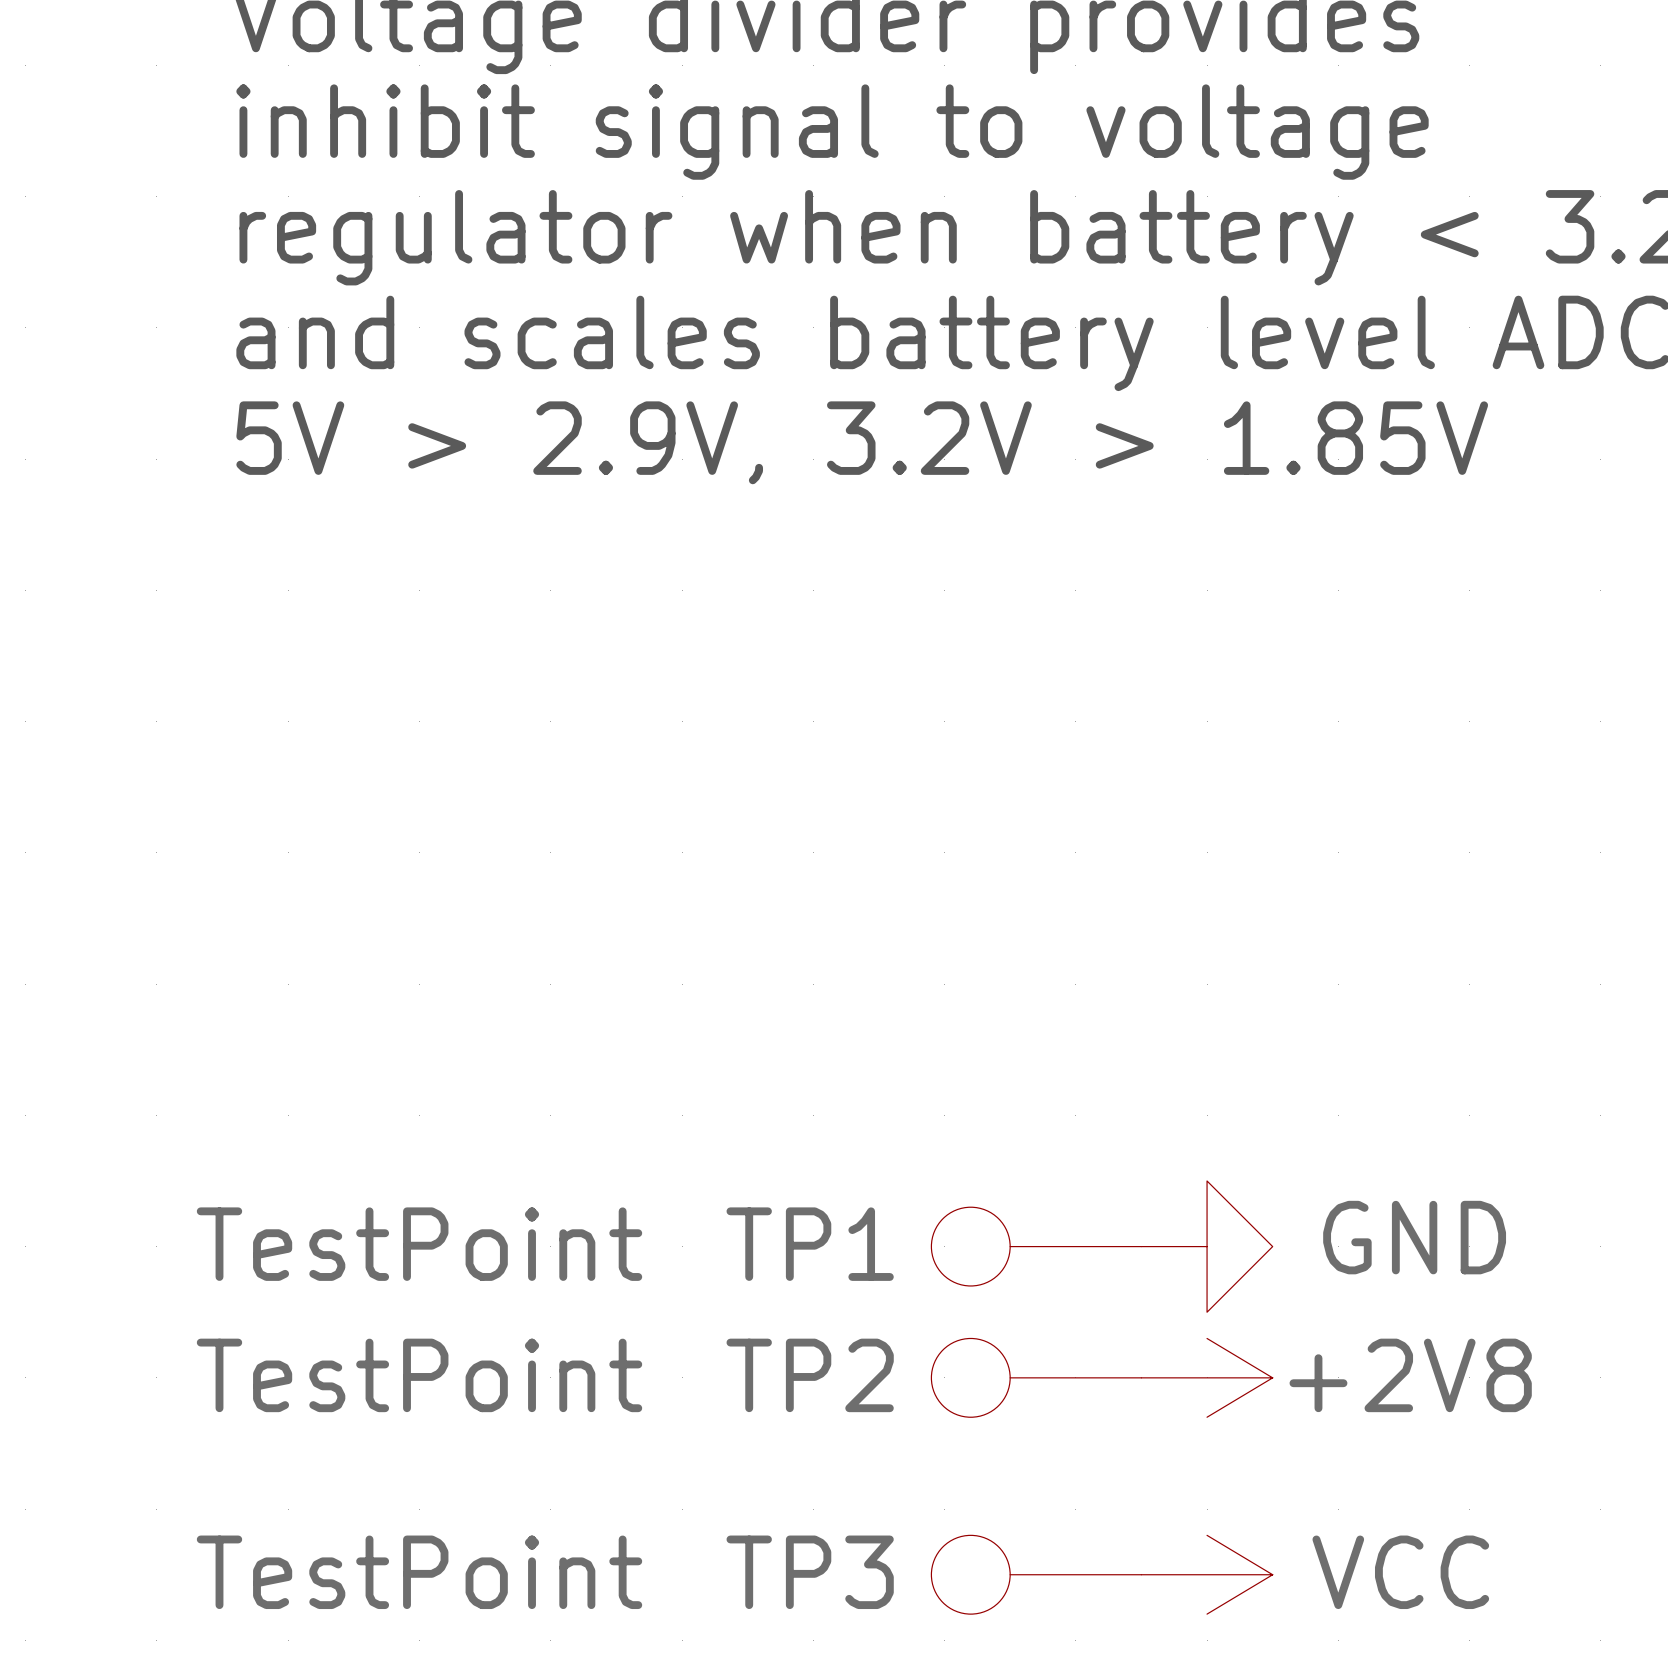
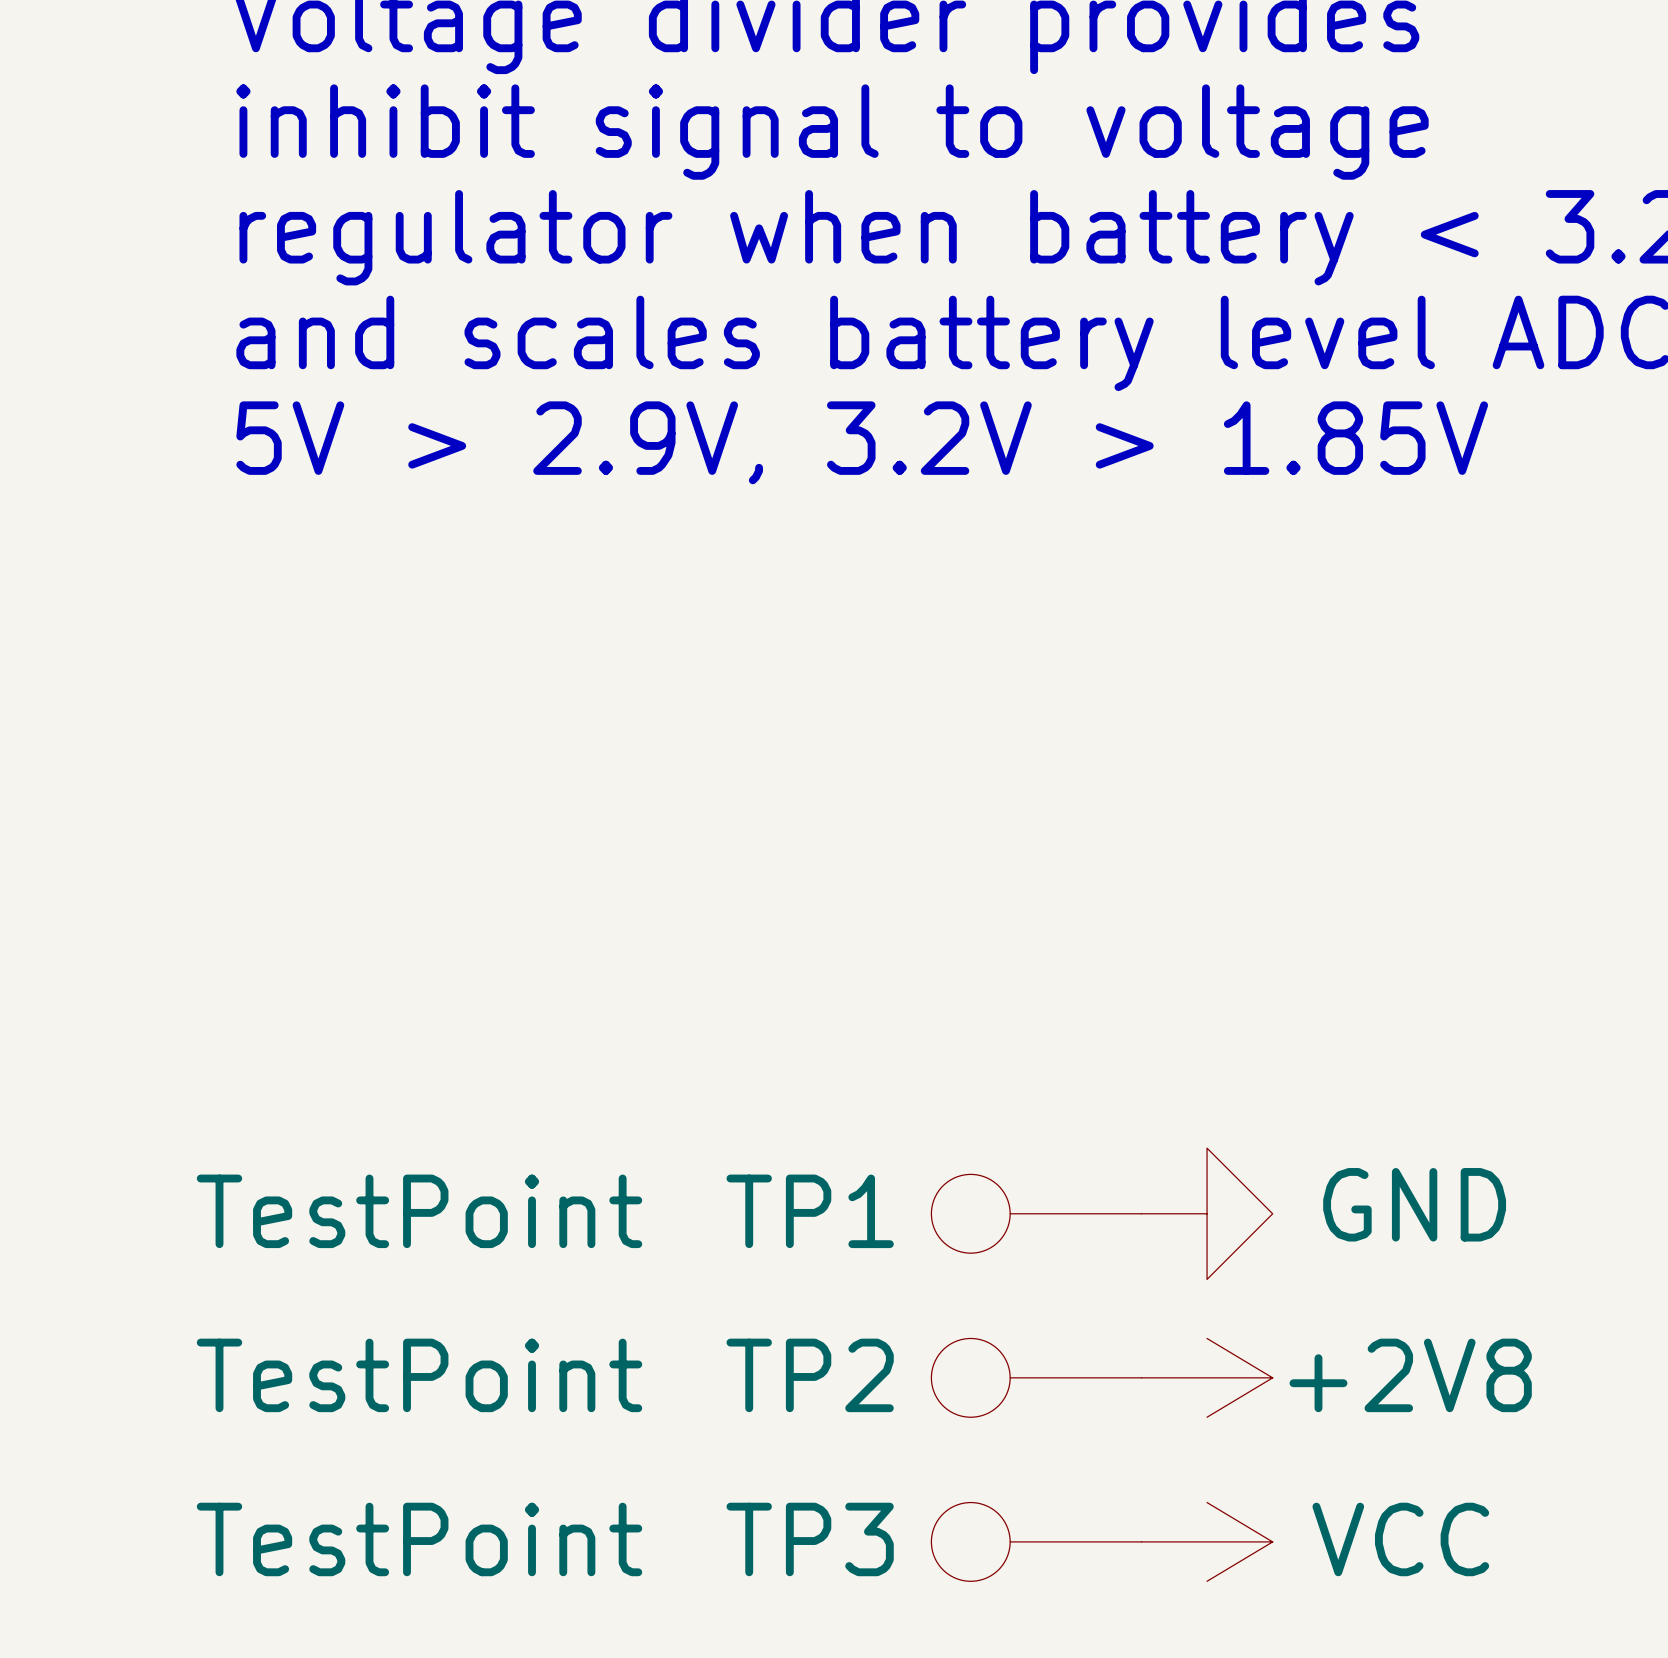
TP1 position: (1036, 1246) -> (1036, 1213)
power symbol position: GND (1207, 1246) -> GND (1207, 1213)
TP3 position: (1036, 1574) -> (1036, 1541)
power symbol position: VCC (1207, 1574) -> VCC (1207, 1541)

